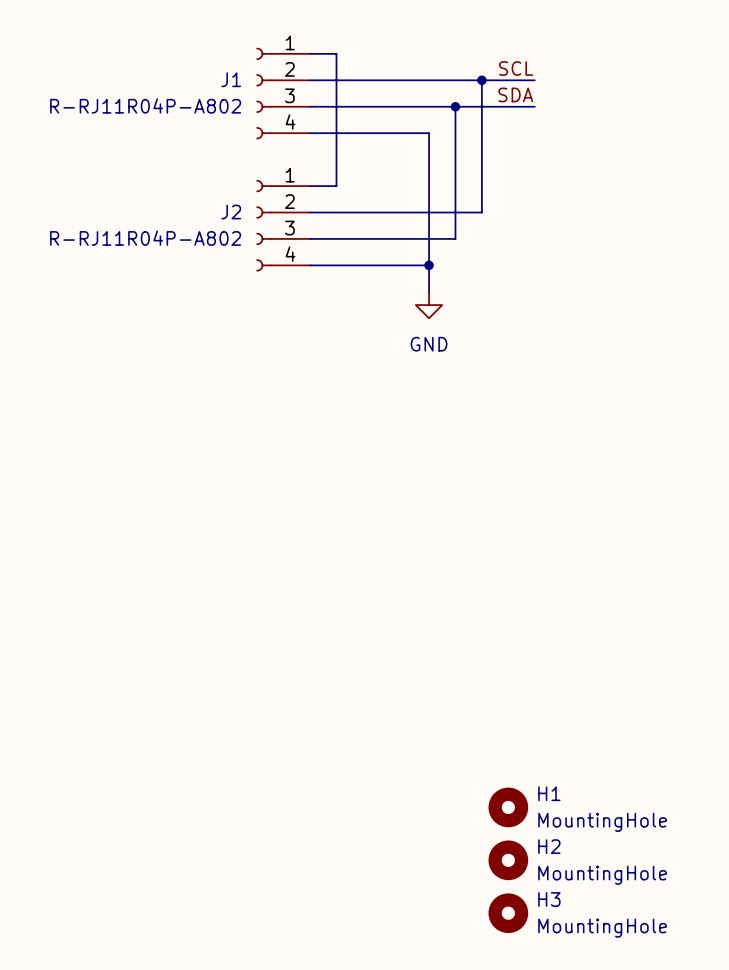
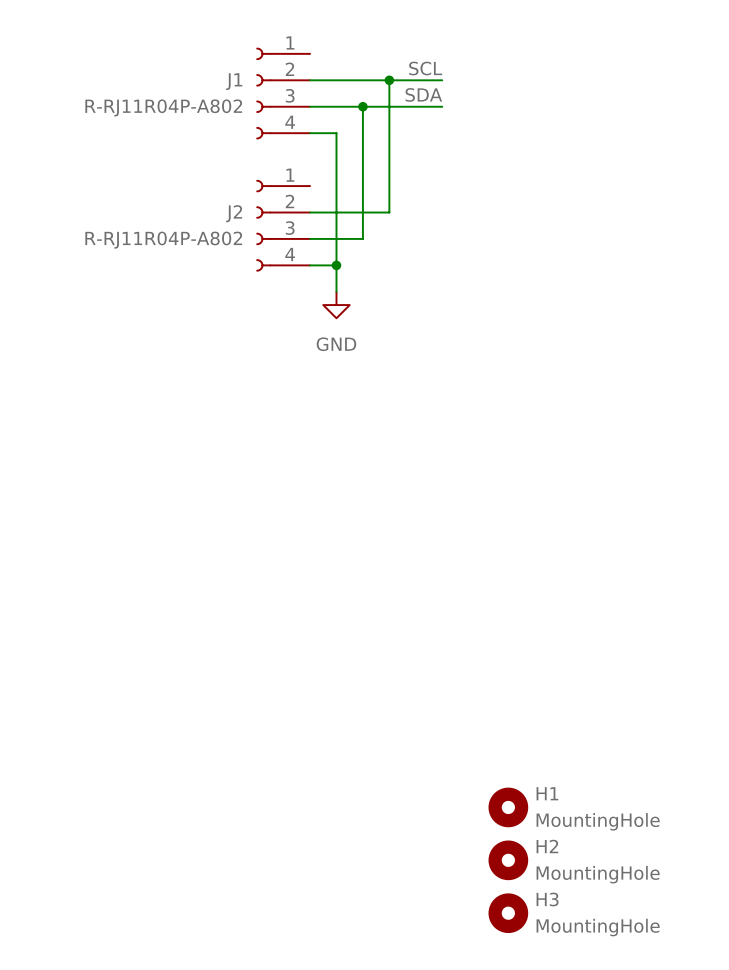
wire: (310, 53) (336, 53) (336, 133) (429, 133) (429, 291) -> none
label position: SCL (516, 68) -> SCL (425, 68)
junction: none -> (389, 80)
wire: (442, 80) (534, 80) -> none
wire: (481, 80) (481, 212) (389, 212) -> (389, 80) (389, 212)
junction: (481, 80) -> none
label position: SDA (515, 94) -> SDA (423, 94)
junction: none -> (362, 106)
wire: (442, 106) (534, 106) -> none
wire: (455, 106) (455, 238) (362, 238) -> (362, 106) (362, 238)
junction: (455, 106) -> none
wire: (310, 186) (336, 186) -> (336, 291) (336, 186)
wire: (336, 265) (429, 265) -> none
junction: none -> (336, 265)
junction: (429, 265) -> none
power symbol position: GND (429, 305) -> GND (336, 305)

